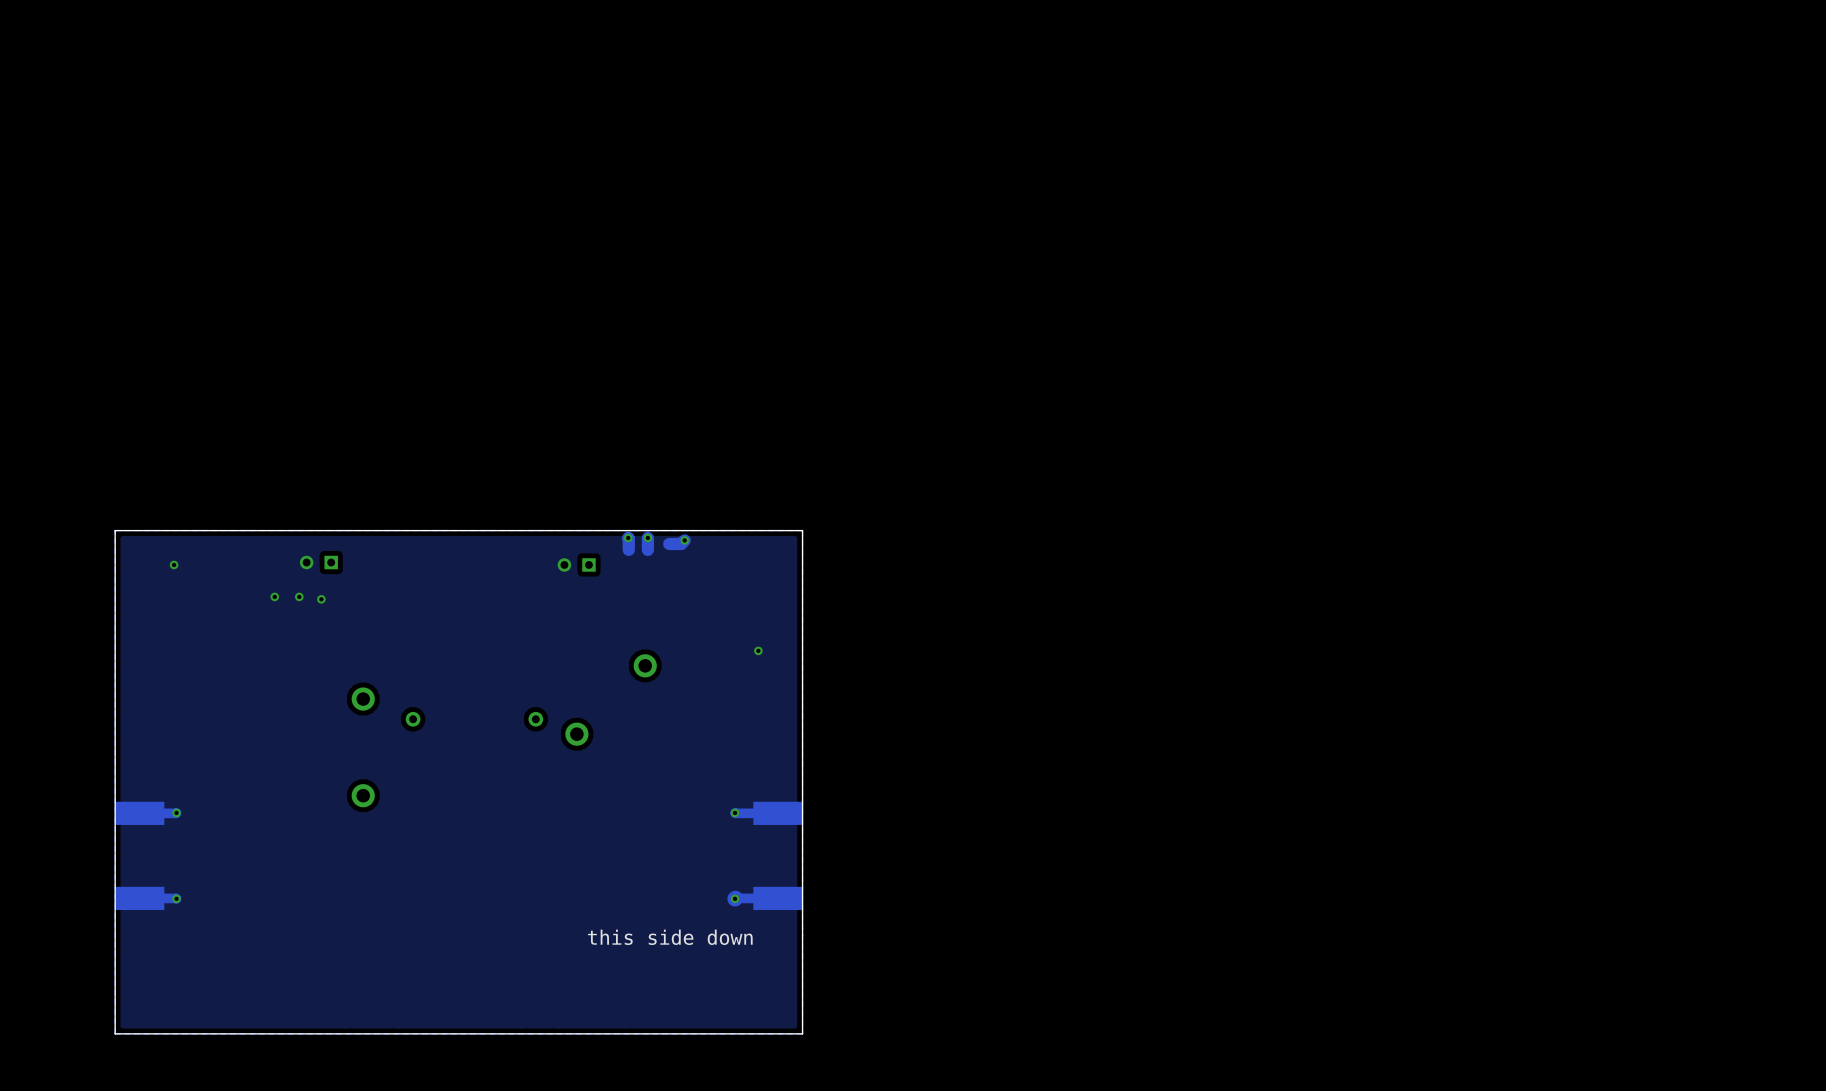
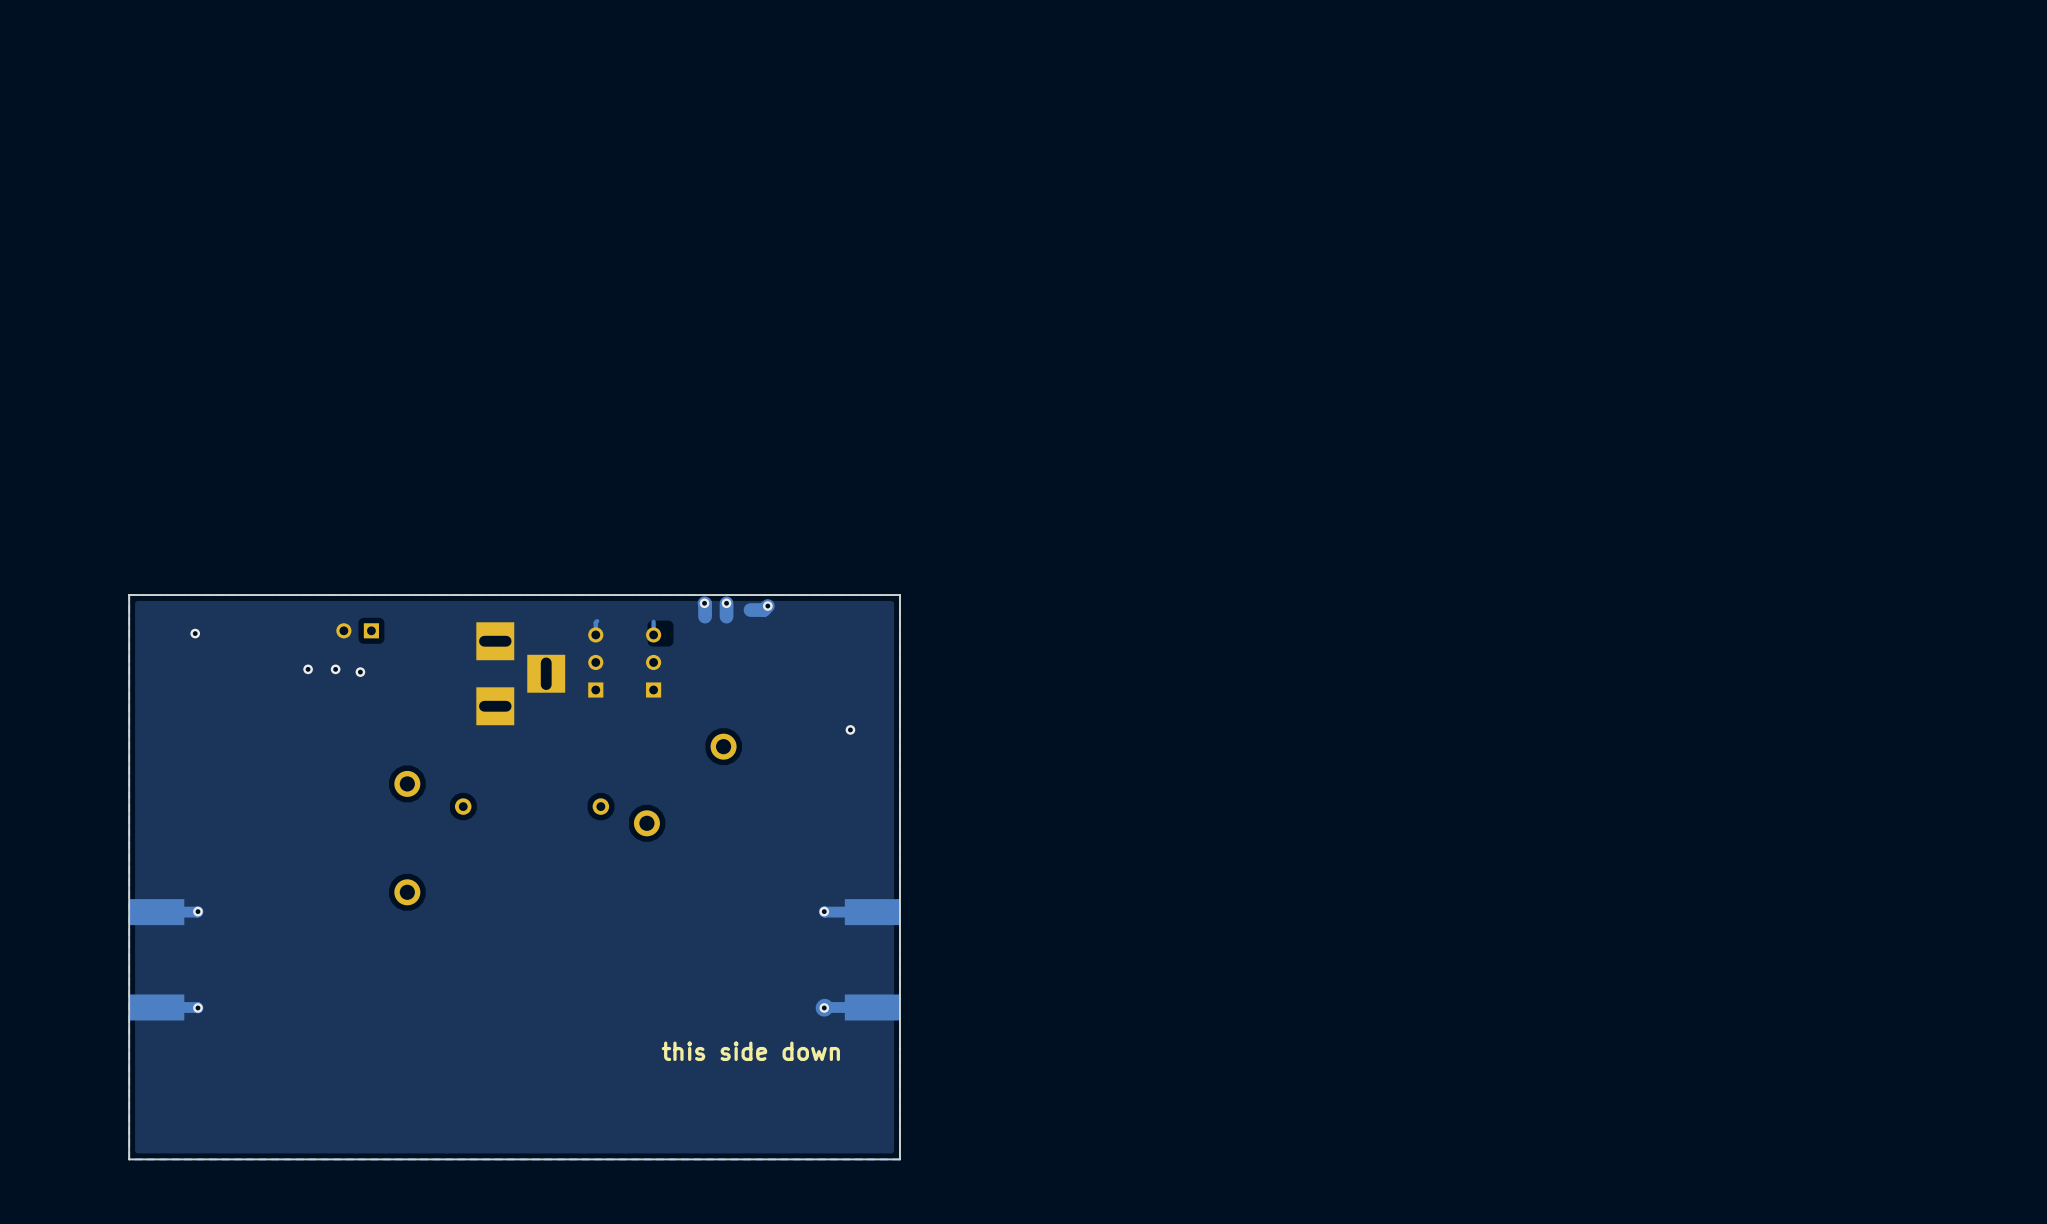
track: none -> (597, 621) (595, 634)
track: none -> (653, 621) (653, 634)
part: (576, 564) -> none
part: none -> (595, 662)
part: none -> (653, 662)
part: none -> (520, 673)

